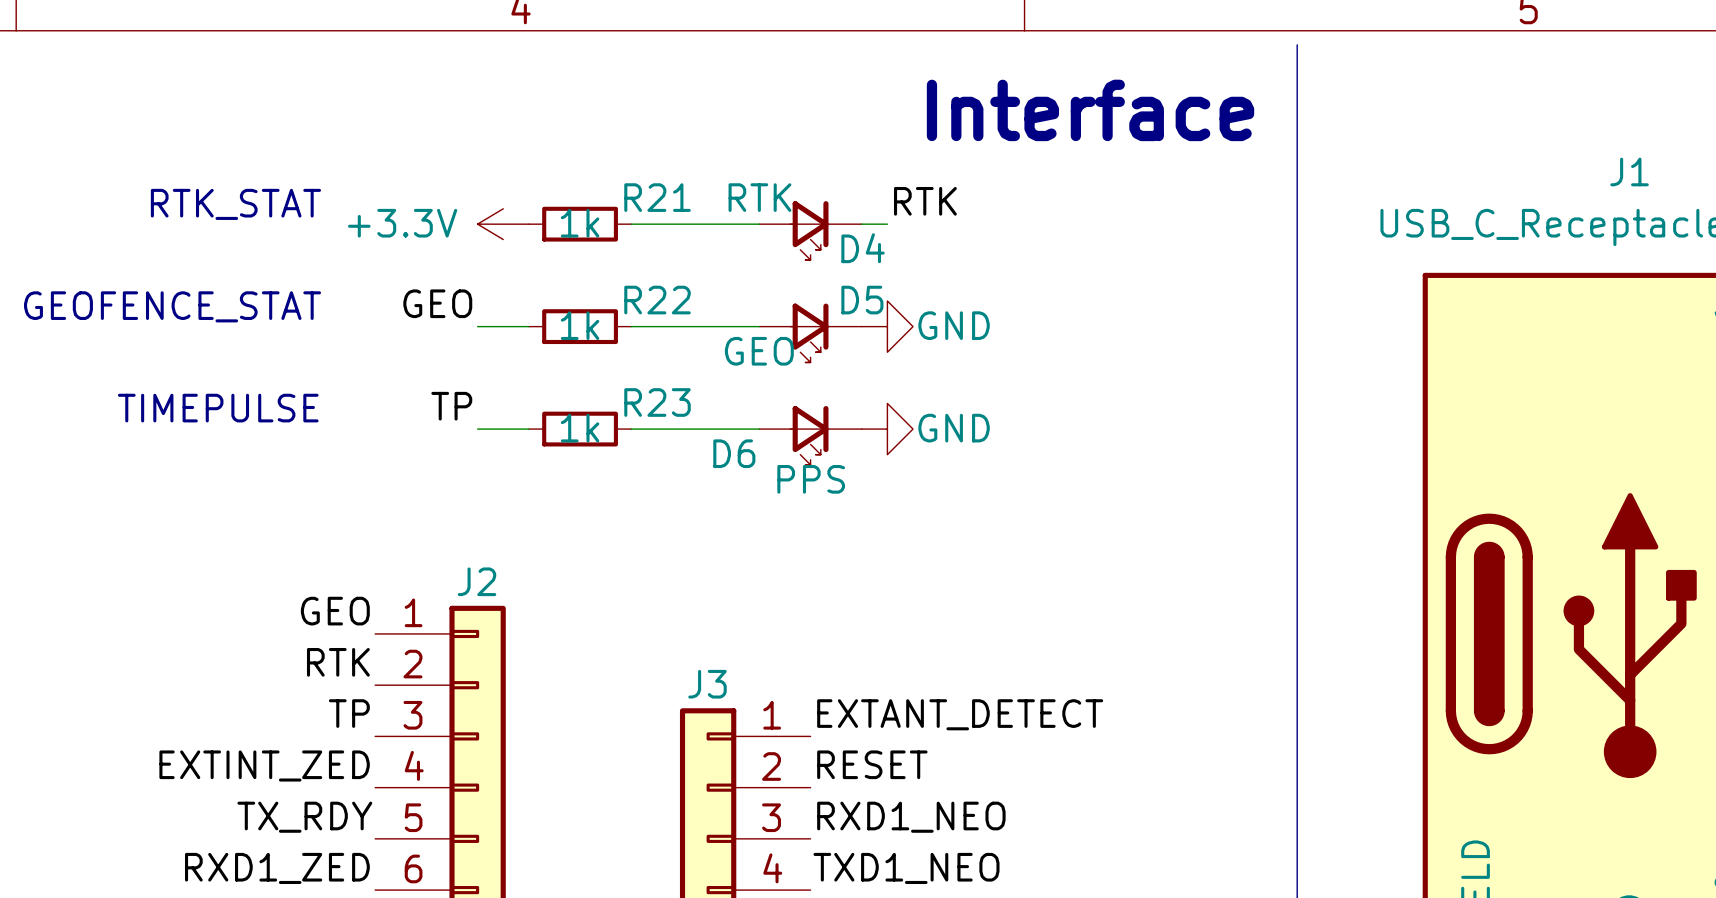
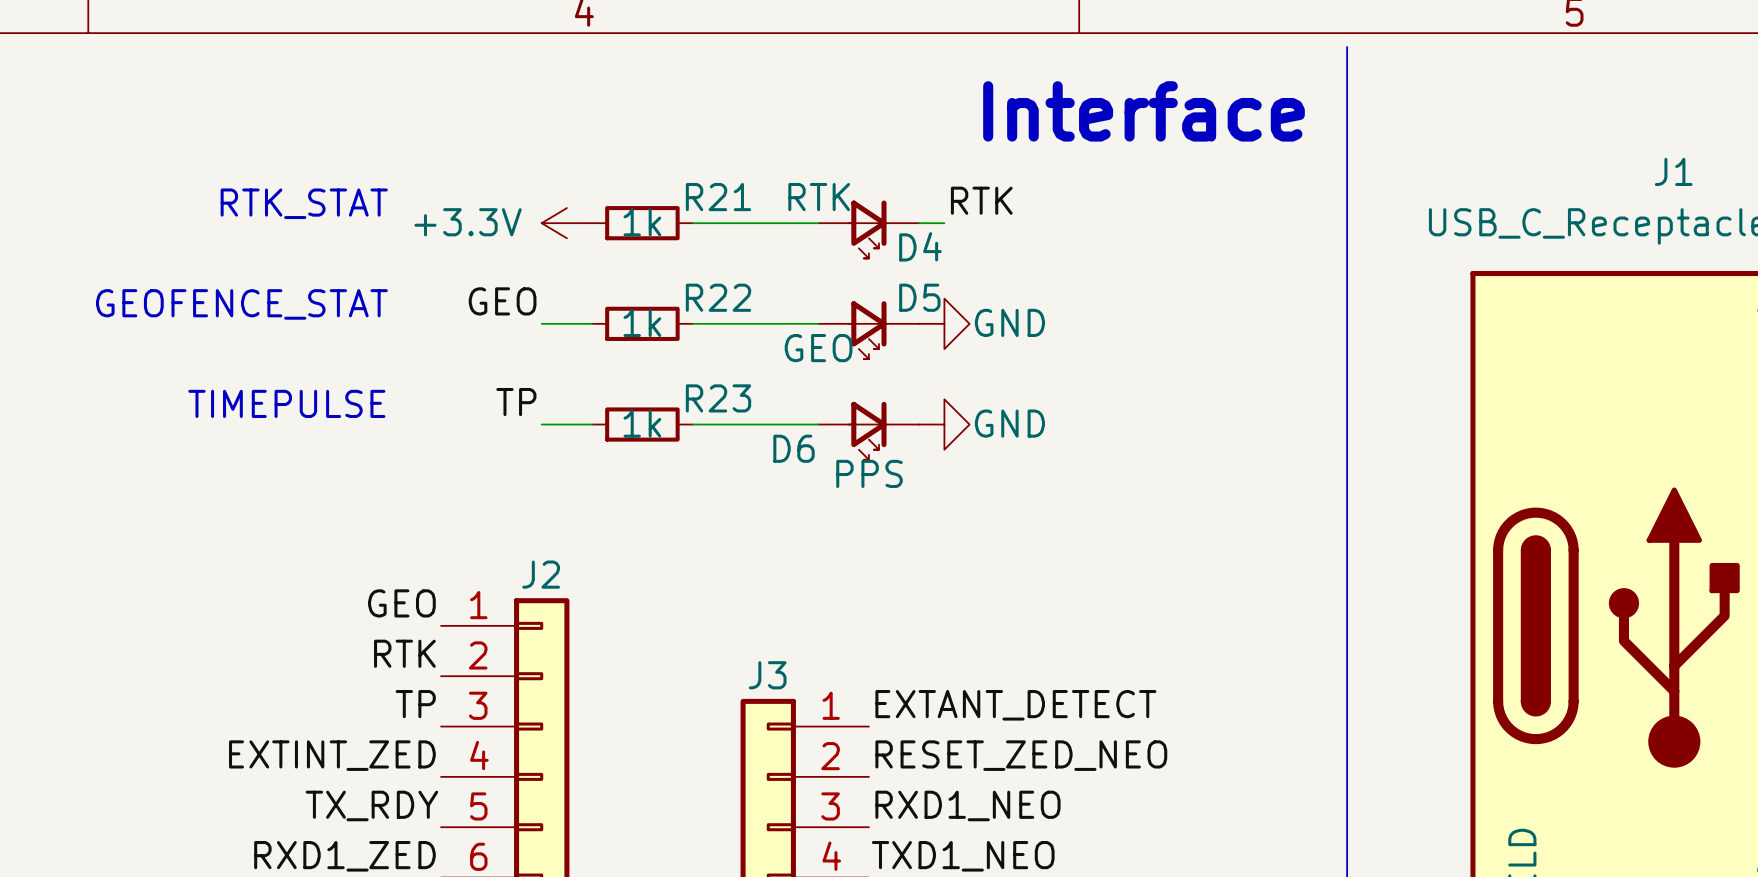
label: RESET (872, 764) -> RESET_ZED_NEO (1021, 755)

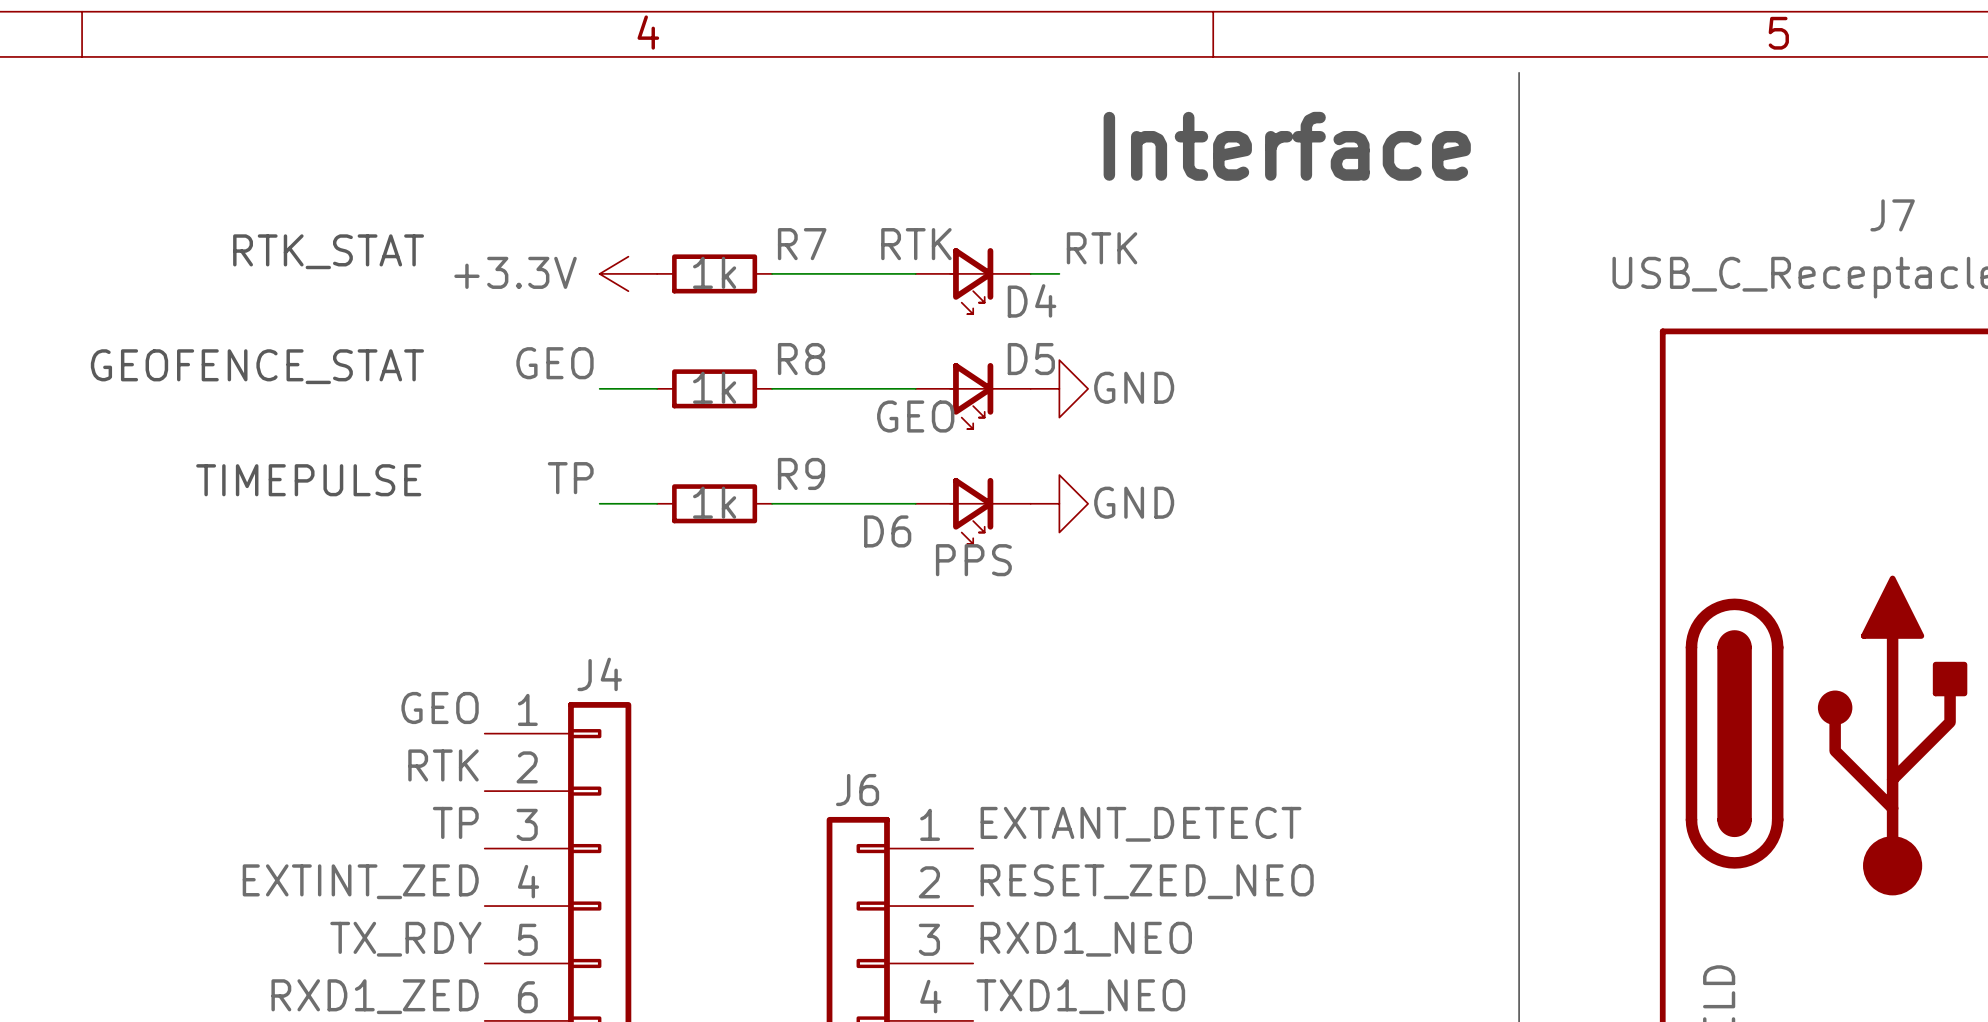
J1 name: J1 (1673, 171) -> J7 (1892, 215)
R21 name: R21 (718, 197) -> R7 (802, 244)
R22 name: R22 (718, 297) -> R8 (801, 359)
R23 name: R23 (718, 398) -> R9 (801, 473)
J2 name: J2 (541, 574) -> J4 (599, 674)
J3 name: J3 (767, 675) -> J6 (857, 790)

